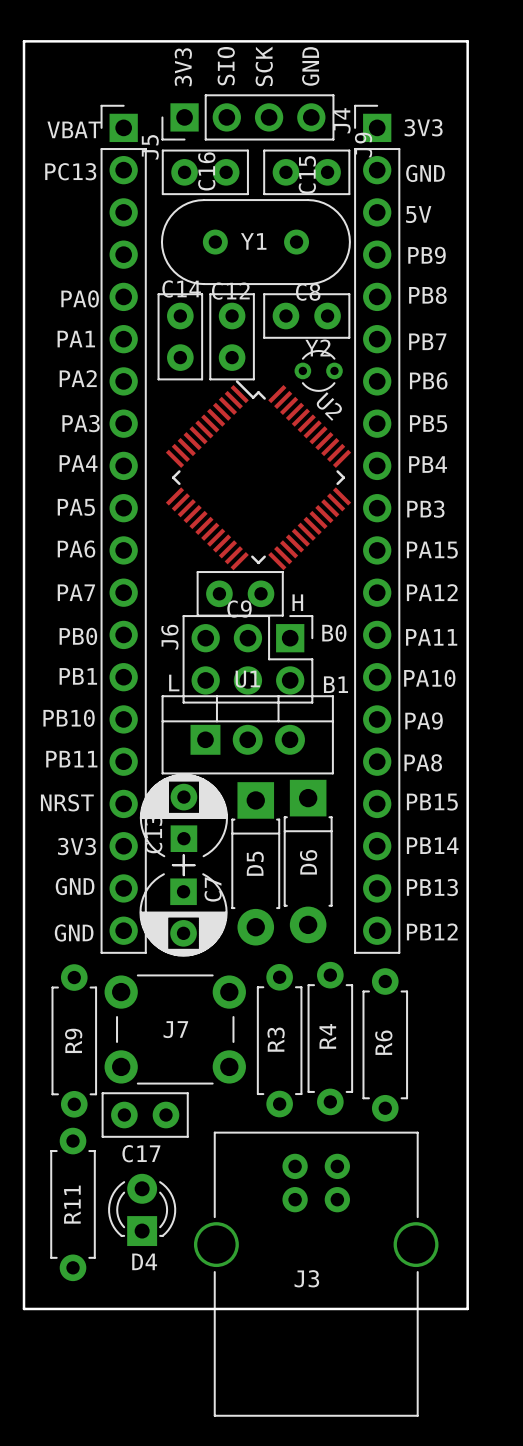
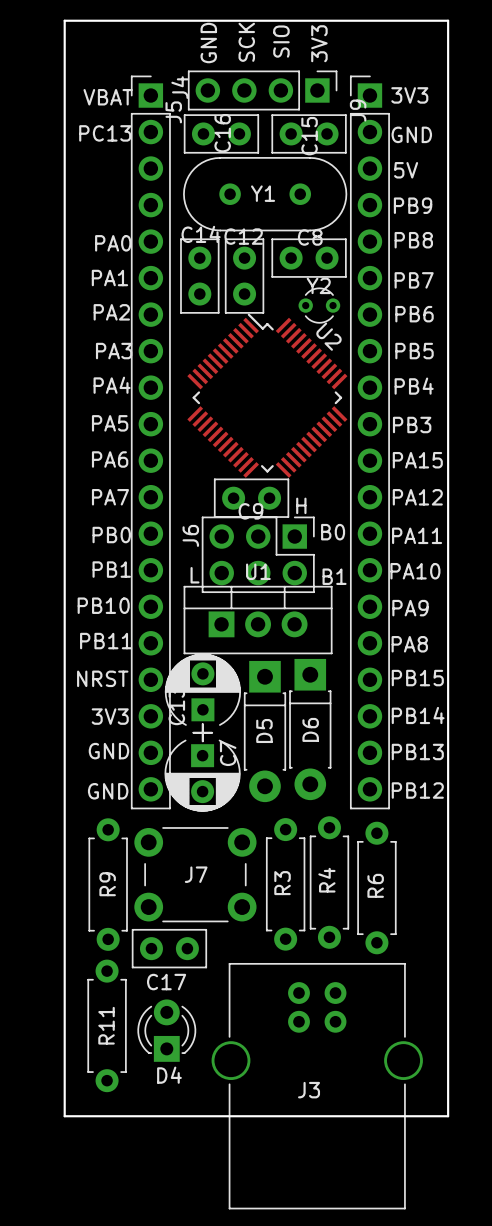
text: SIO (226, 66) -> SCK (246, 42)
text: SCK (264, 66) -> SIO (281, 41)
text: GND (310, 66) -> 3V3 (319, 43)
text: 3V3 (183, 67) -> GND (208, 43)
J4 rotation: 0° (247, 117) -> 180° (262, 90)

